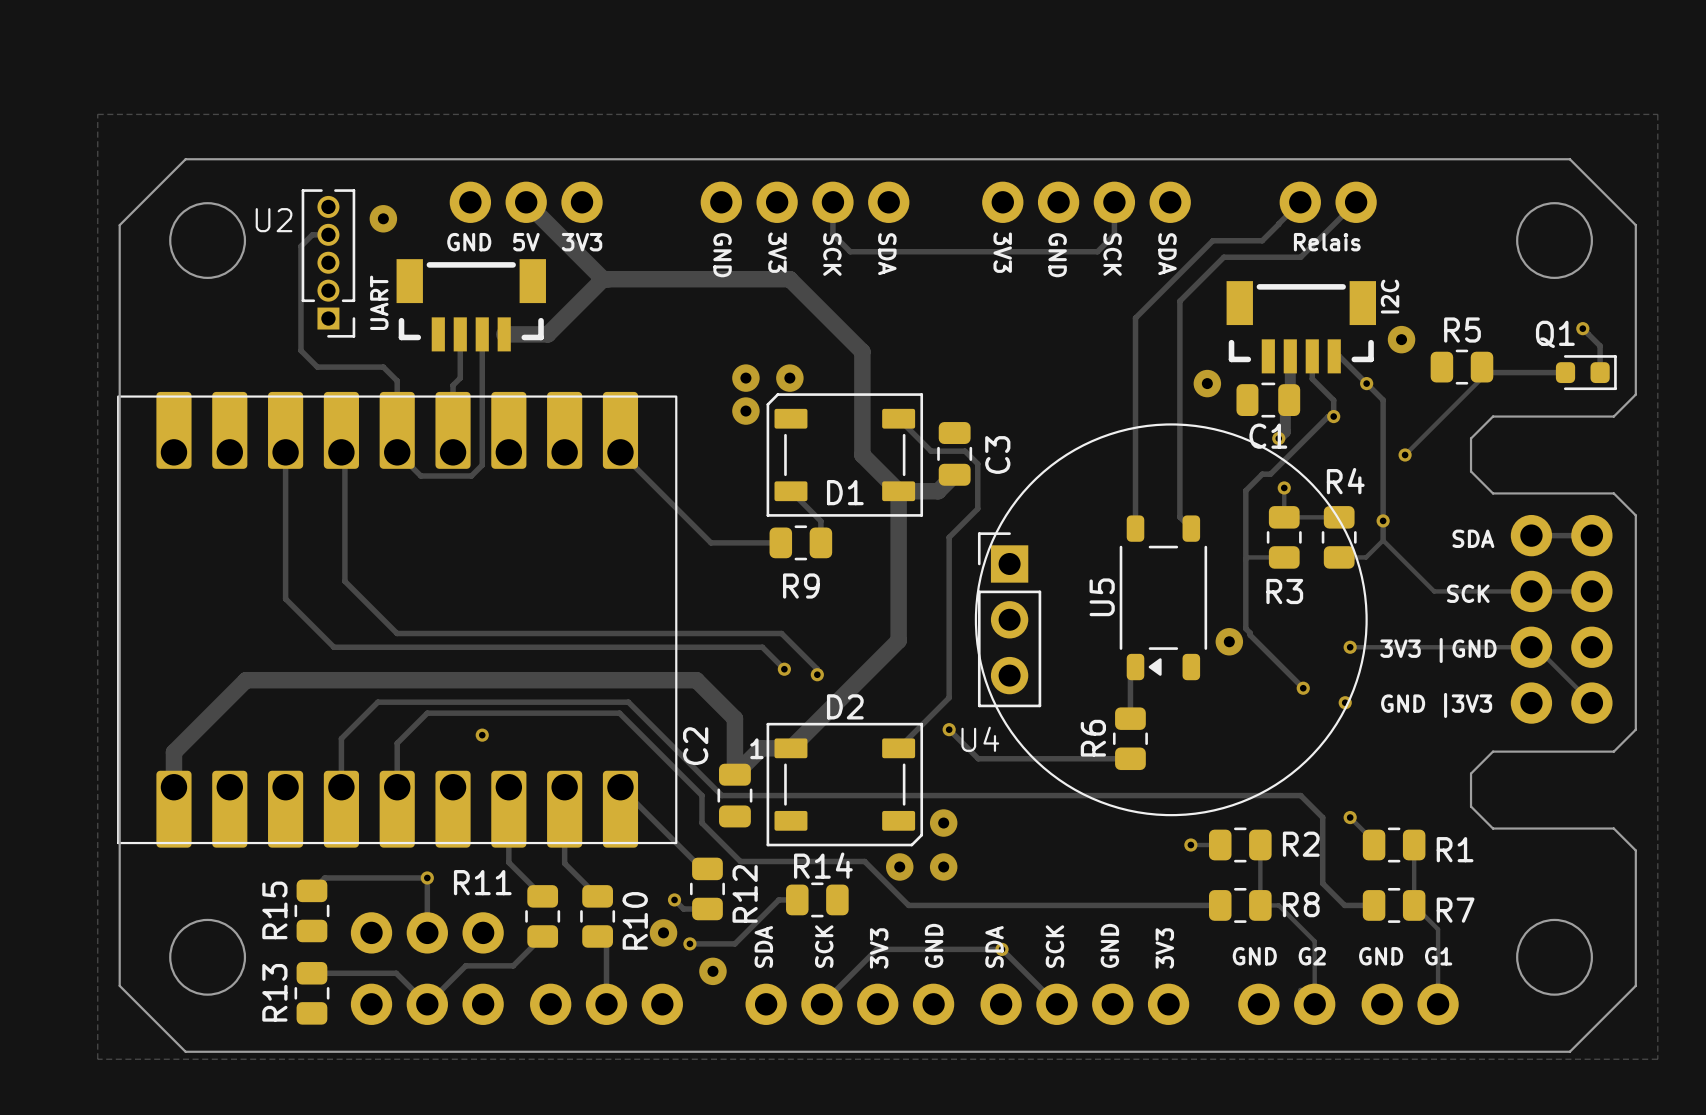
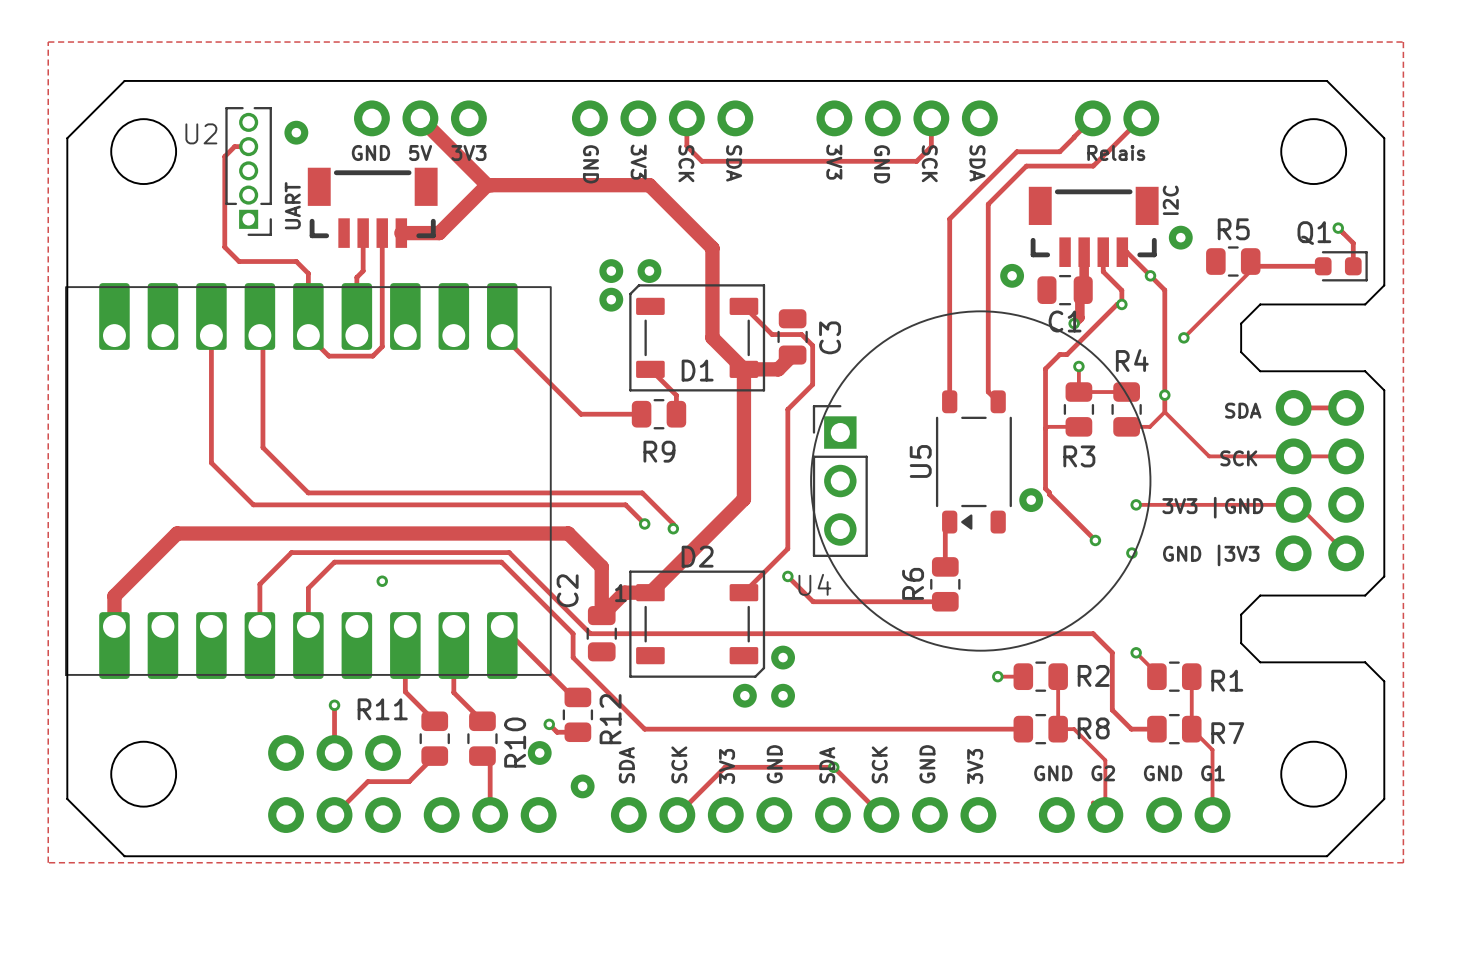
track: (740, 861) (864, 861) (908, 905) -> (606, 690) (644, 729) (752, 729)
track: (427, 877) (324, 877) (311, 890) -> none
track: (797, 899) (778, 899) (734, 943) (689, 943) -> none
R14: (817, 899) -> none
R15: (311, 910) -> none
via: (689, 943) -> none
track: (311, 973) (396, 973) (427, 1004) -> none
R13: (311, 993) -> none

